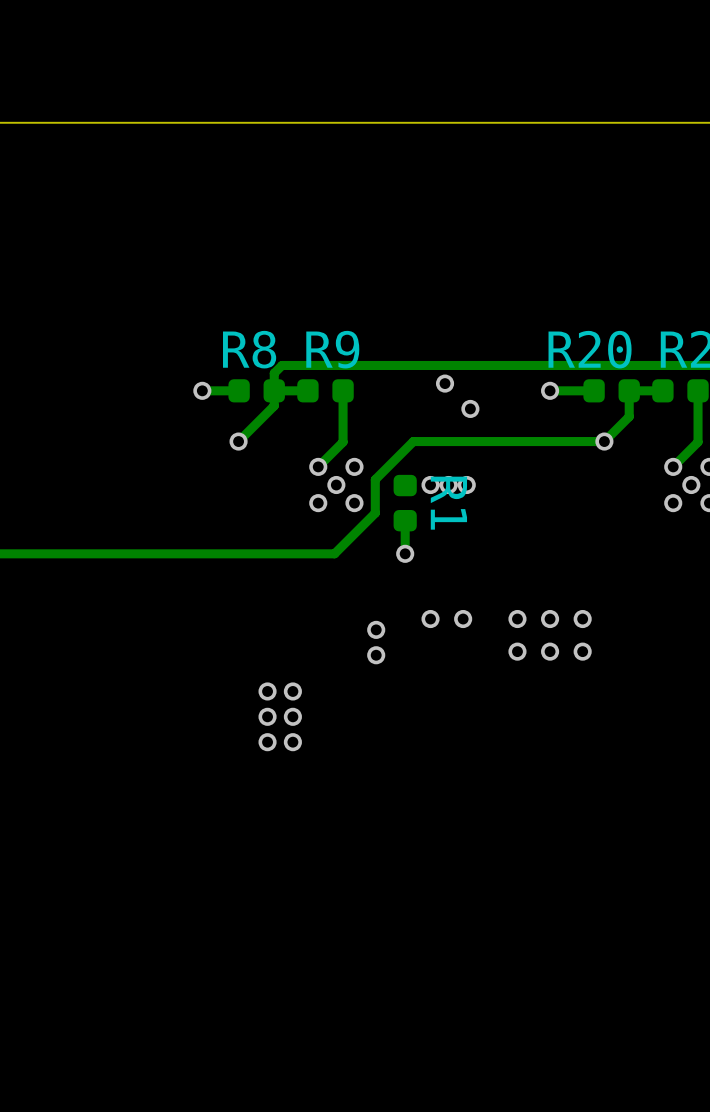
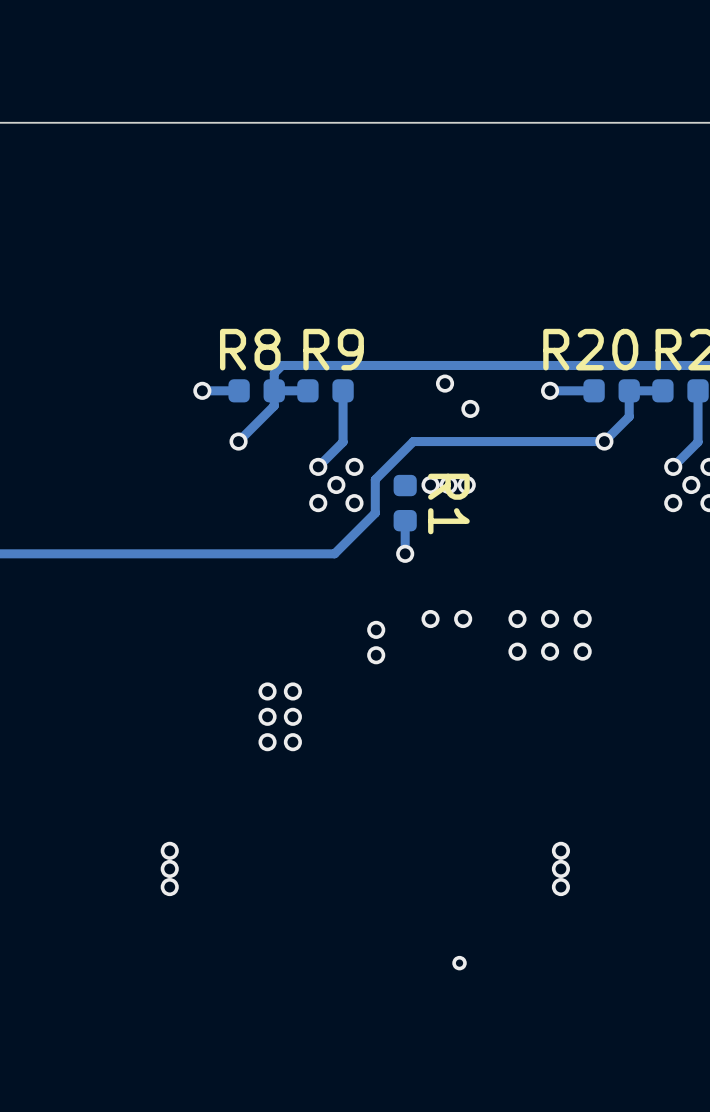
via: none -> (169, 850)
via: none -> (560, 850)
via: none -> (169, 868)
via: none -> (560, 868)
via: none -> (169, 887)
via: none -> (560, 887)
via: none -> (459, 963)

